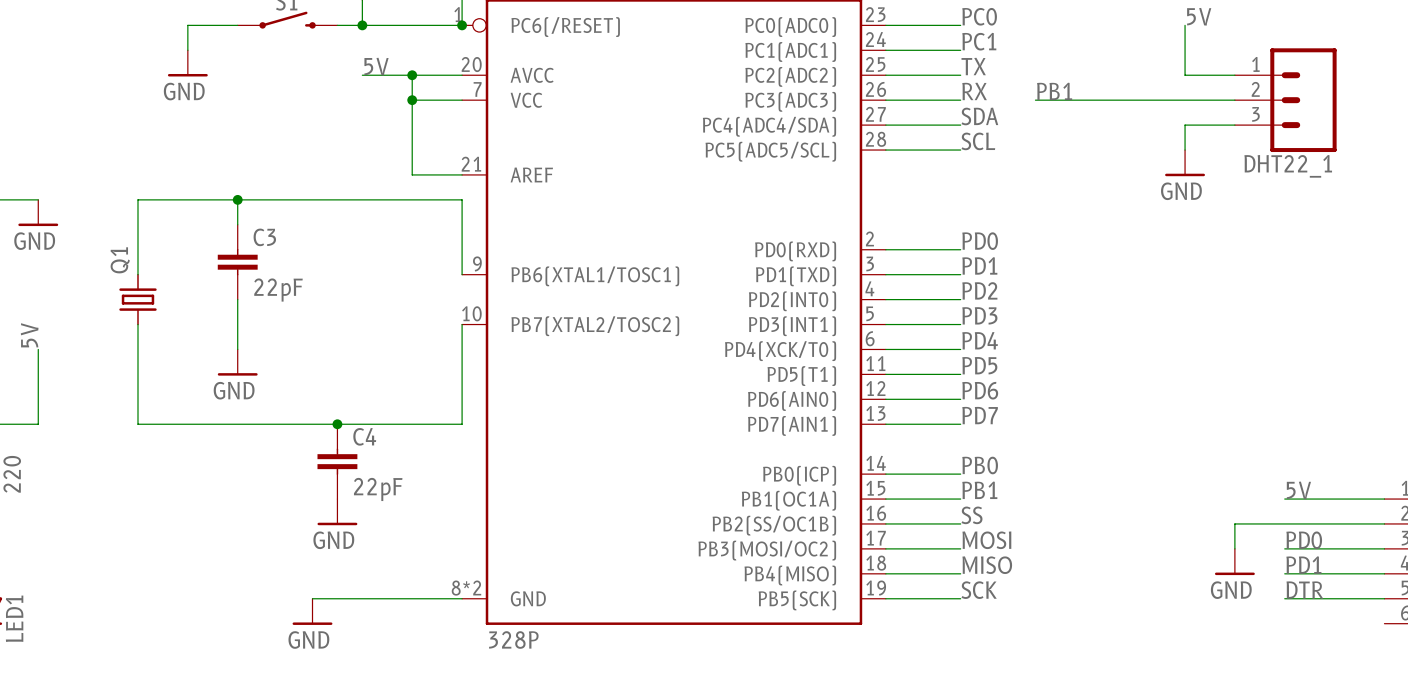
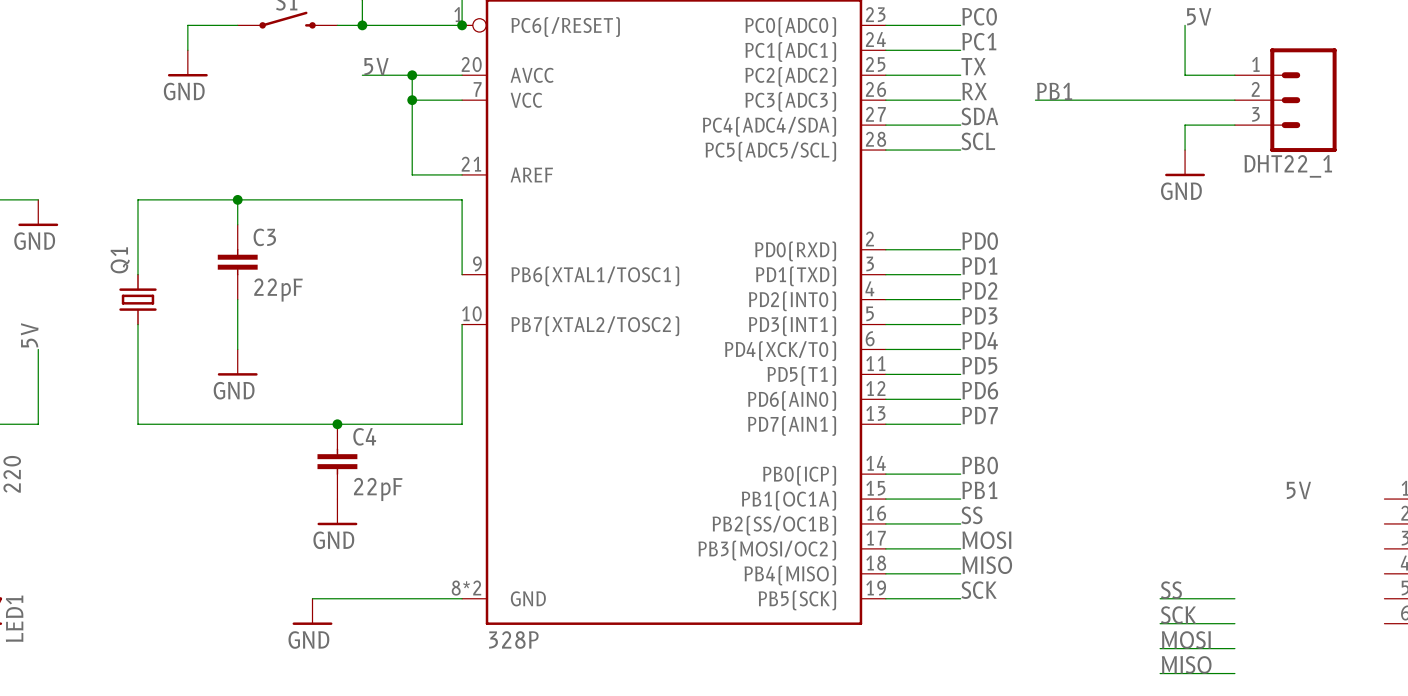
wire: (1284, 499) (1384, 499) -> none
wire: (1384, 523) (1234, 523) (1234, 548) -> none
label: PD0 (1304, 540) -> none
wire: (1284, 548) (1384, 548) -> none
power symbol: GND (1234, 561) -> none
label: PD1 (1303, 565) -> none
wire: (1284, 573) (1384, 573) -> none
label: none -> SS (1171, 590)
label: DTR (1304, 590) -> none
wire: none -> (1160, 598) (1234, 598)
wire: (1284, 598) (1384, 598) -> none
label: none -> SCK (1178, 615)
wire: none -> (1160, 623) (1234, 623)
label: none -> MOSI (1186, 639)
wire: none -> (1160, 648) (1234, 648)
label: none -> MISO (1186, 664)
wire: none -> (1160, 673) (1234, 673)

